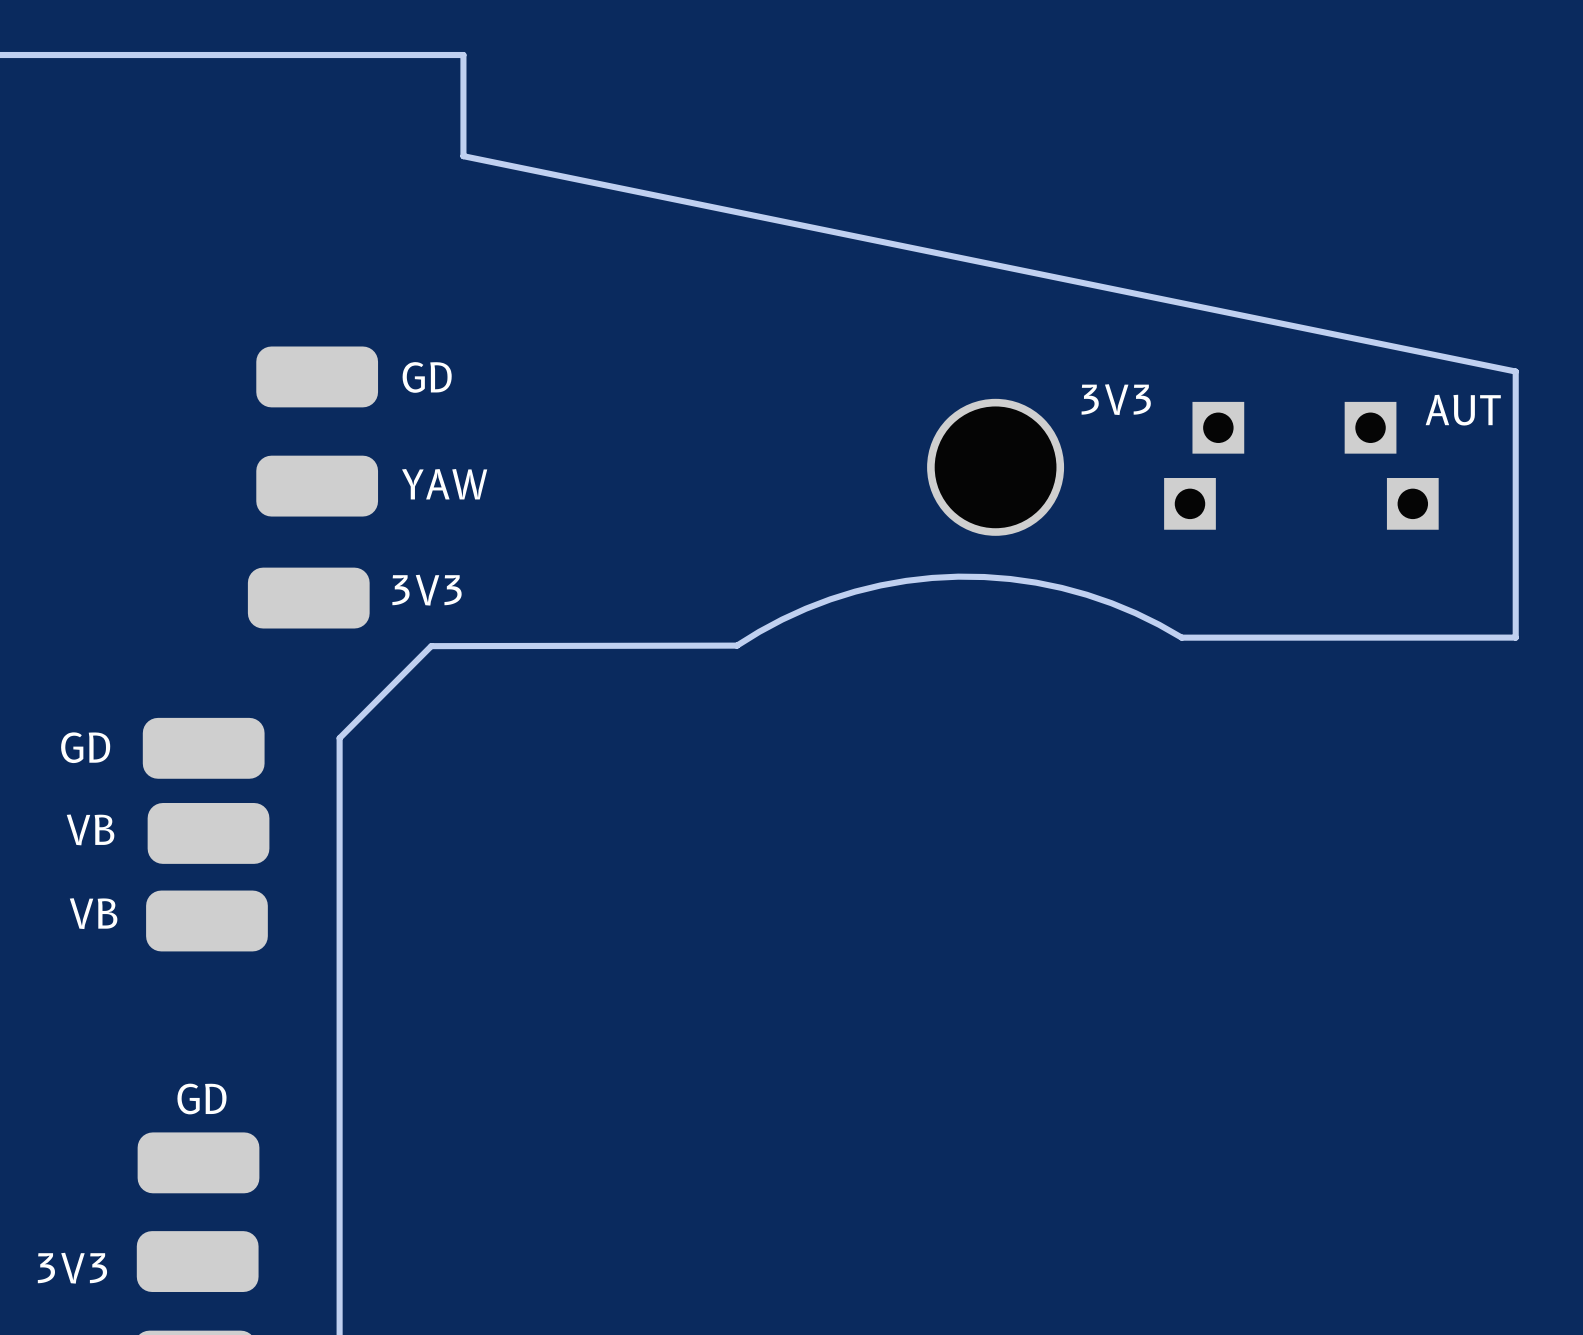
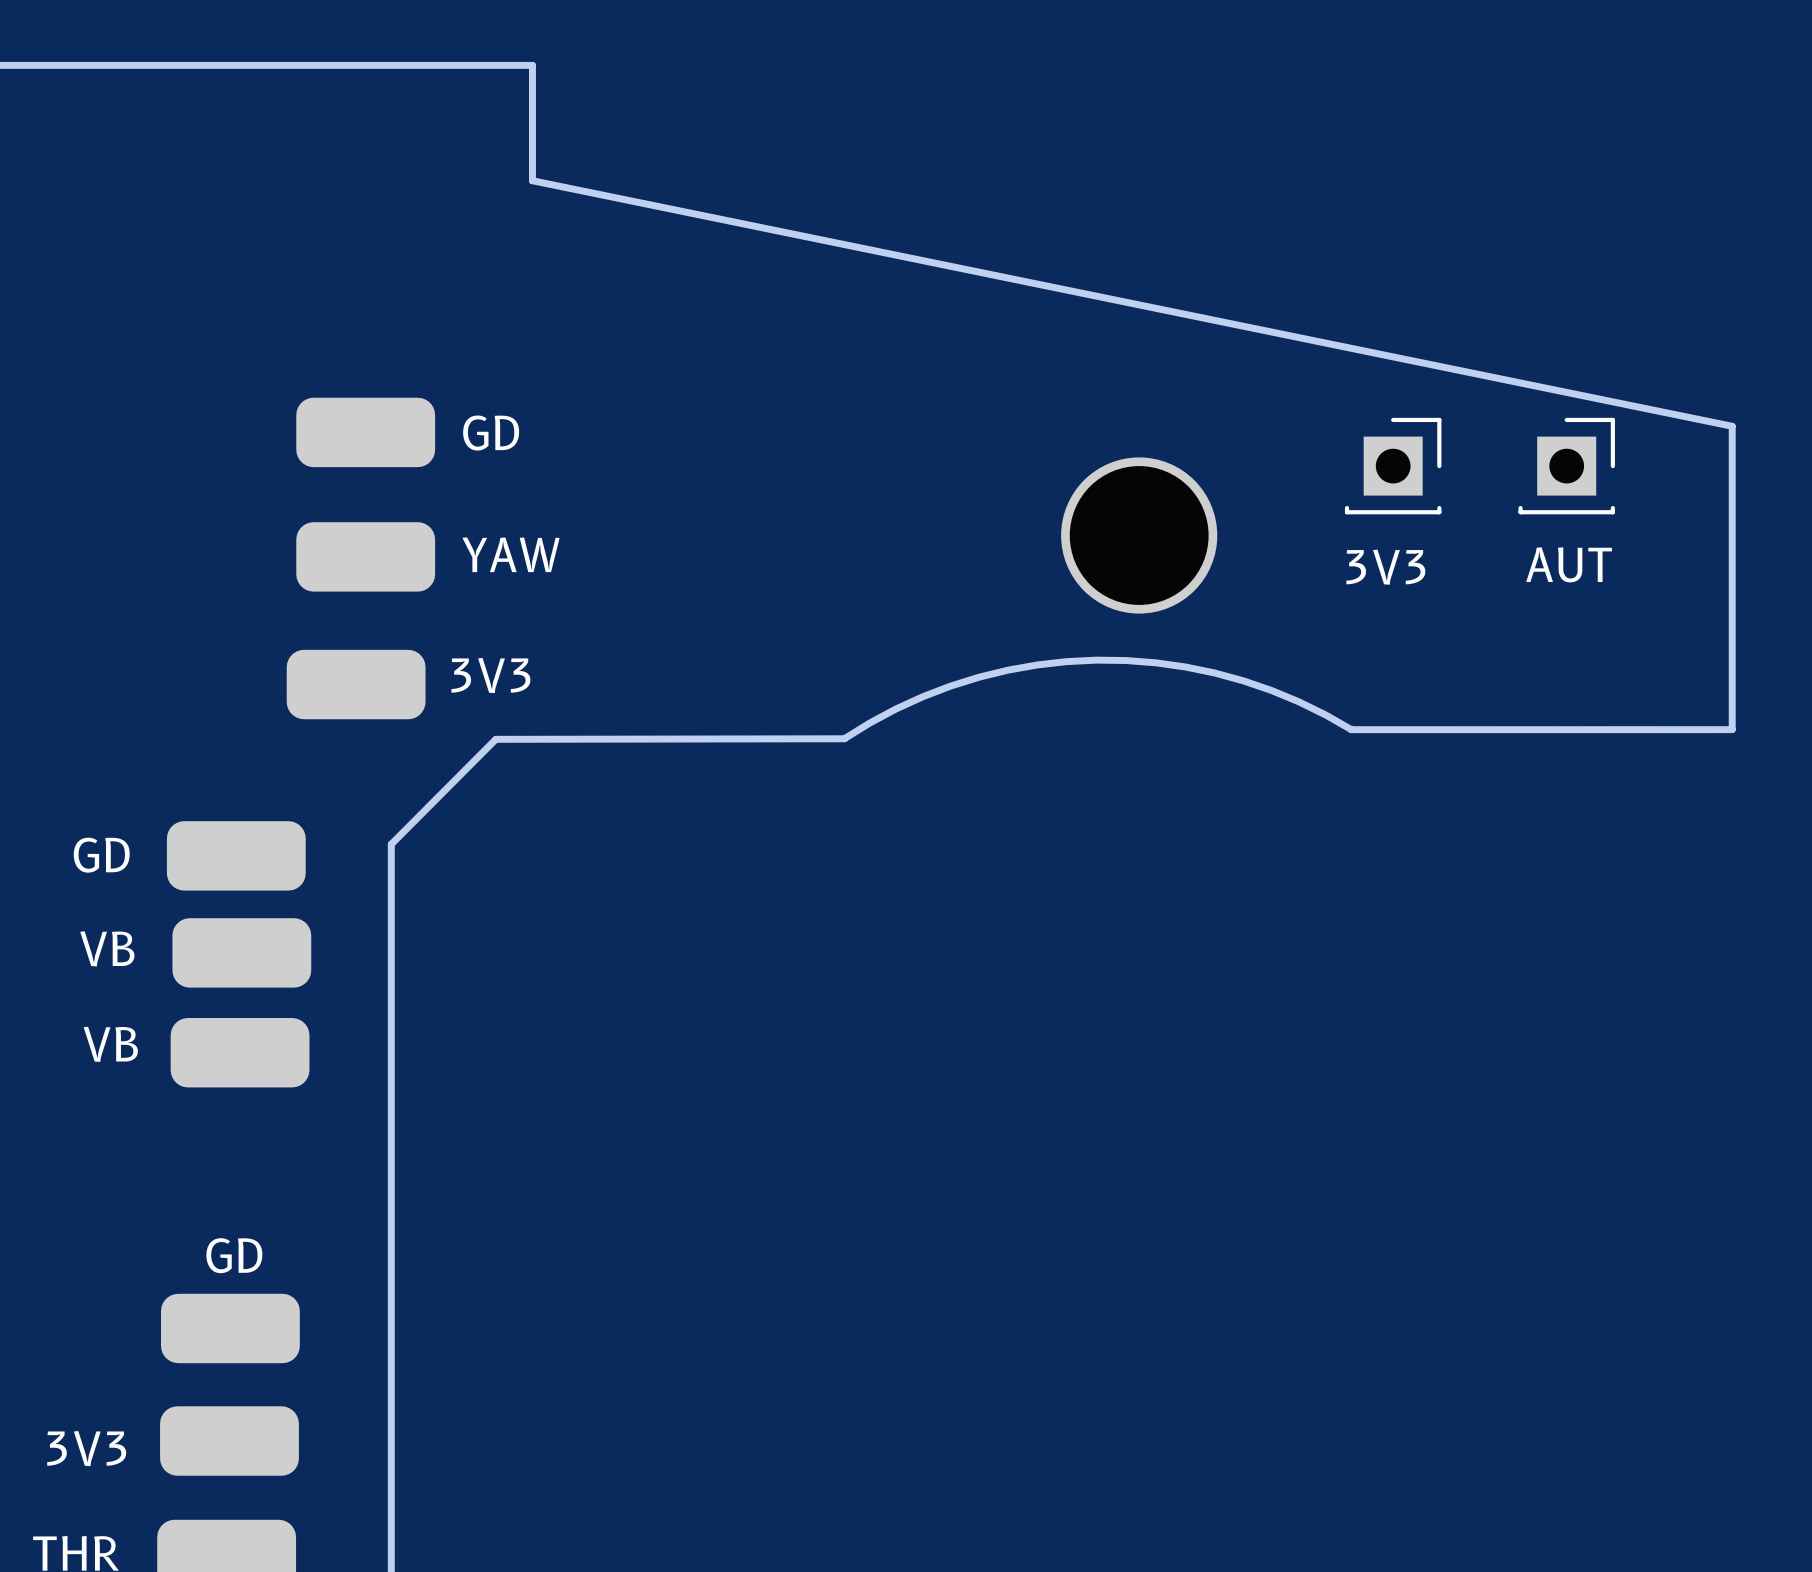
text position: 3V3 (1116, 399) -> 3V3 (1385, 567)
part footprint: [1192, 401, 1245, 454] -> [1344, 417, 1442, 515]
part footprint: [1344, 401, 1397, 454] -> [1518, 417, 1615, 515]
text position: AUT (1463, 410) -> AUT (1569, 564)
part: (1189, 503) -> none
part: (1412, 503) -> none

